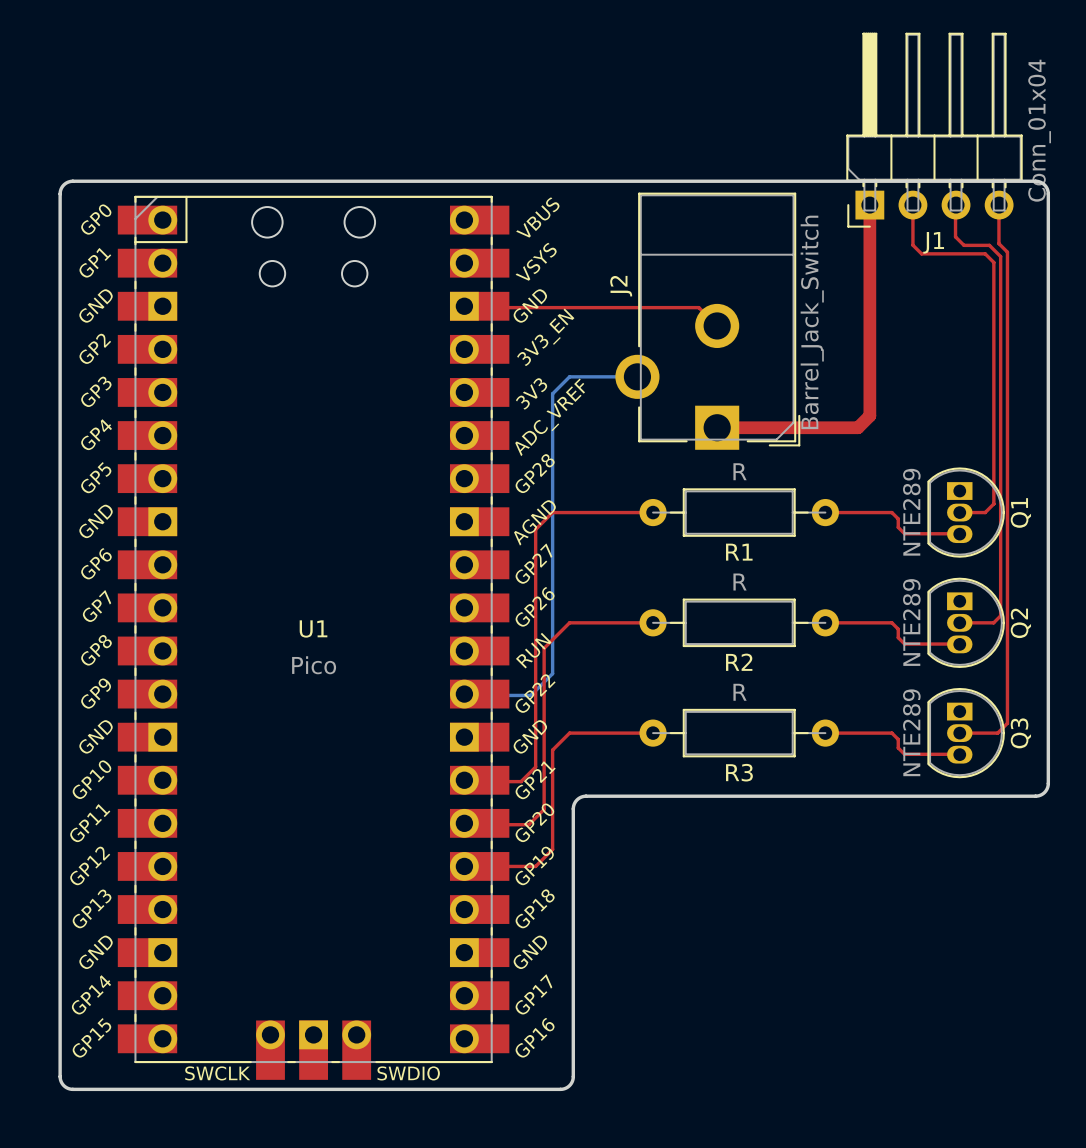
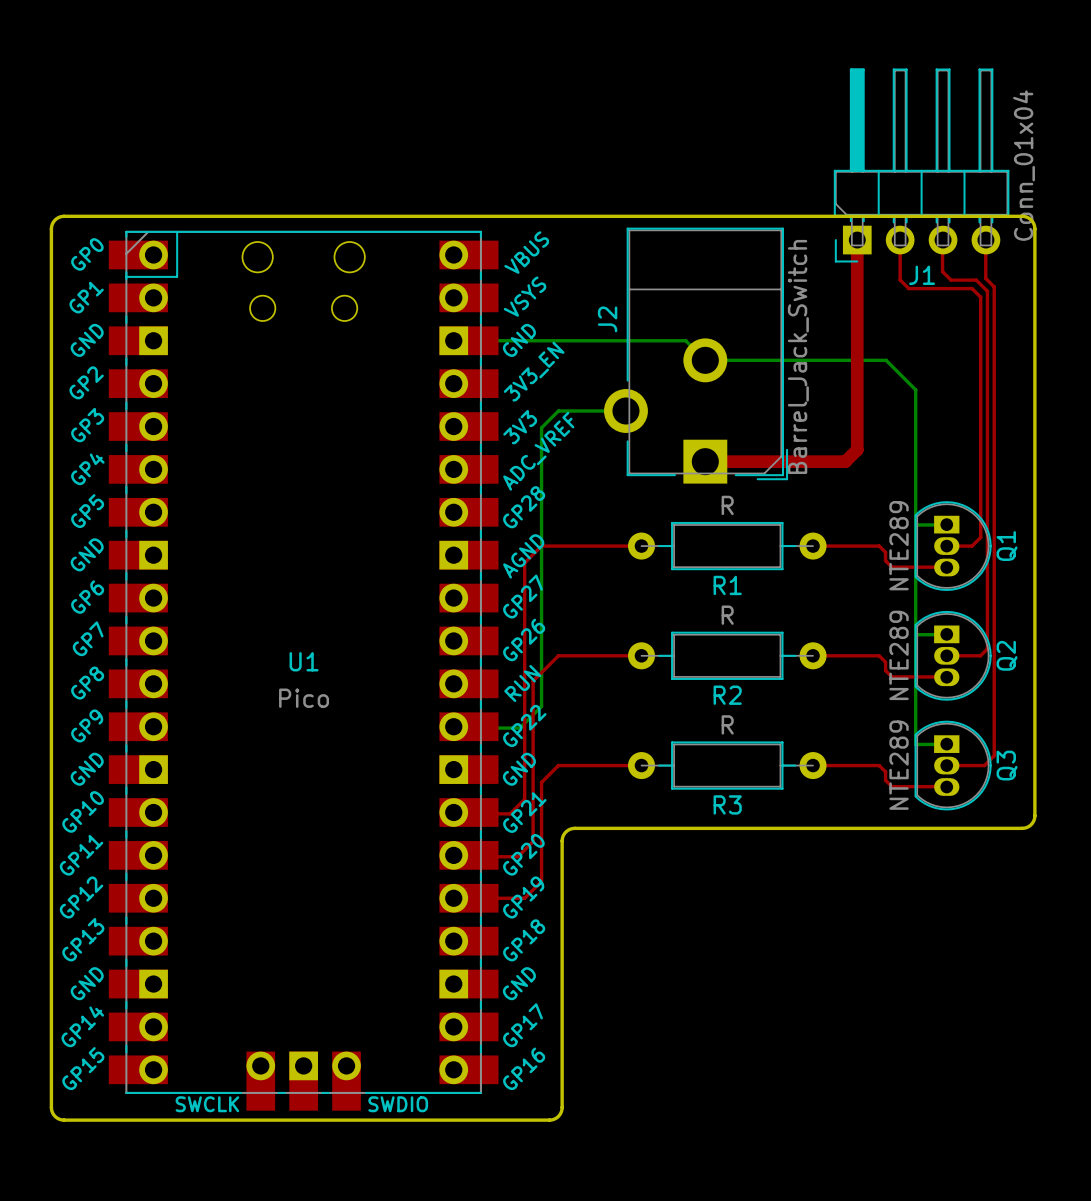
bottom track: none -> (453, 340) (685, 340) (705, 360) (886, 360) (915, 389) (915, 744) (946, 744)
top track: (464, 307) (698, 307) (717, 325) -> none
bottom track: none -> (946, 524) (915, 524)
bottom track: none -> (946, 634) (915, 634)

